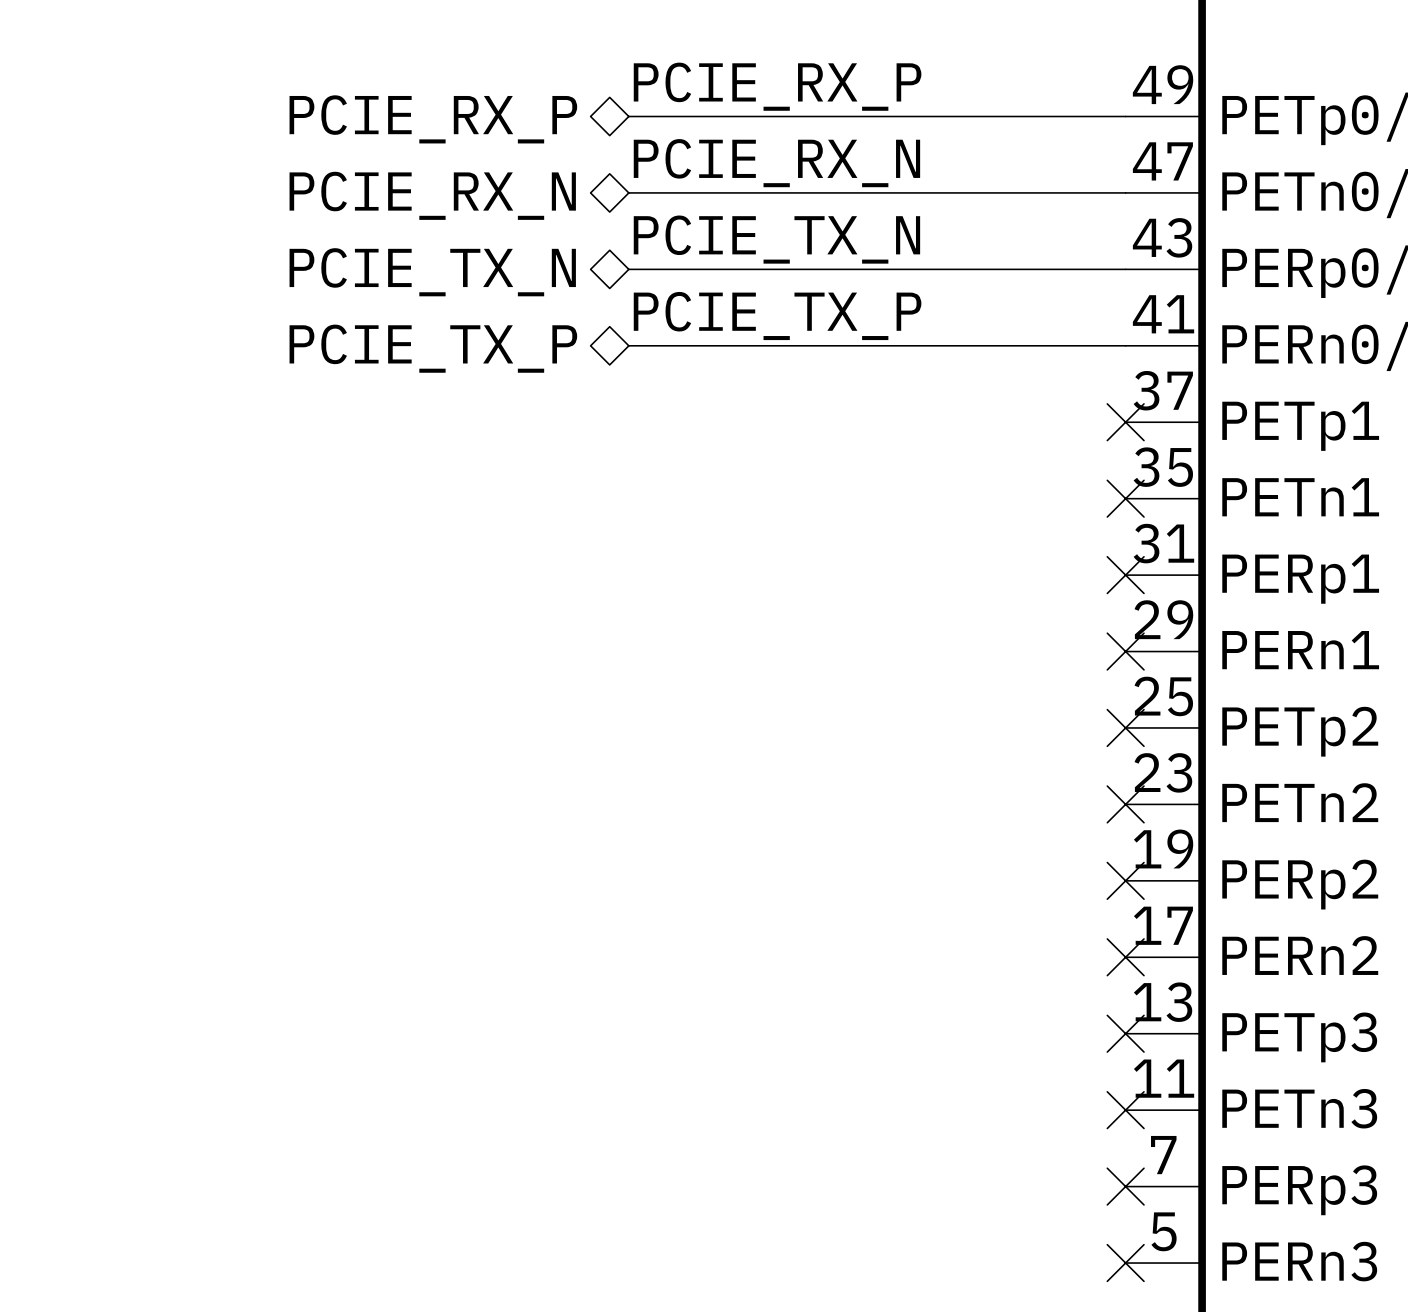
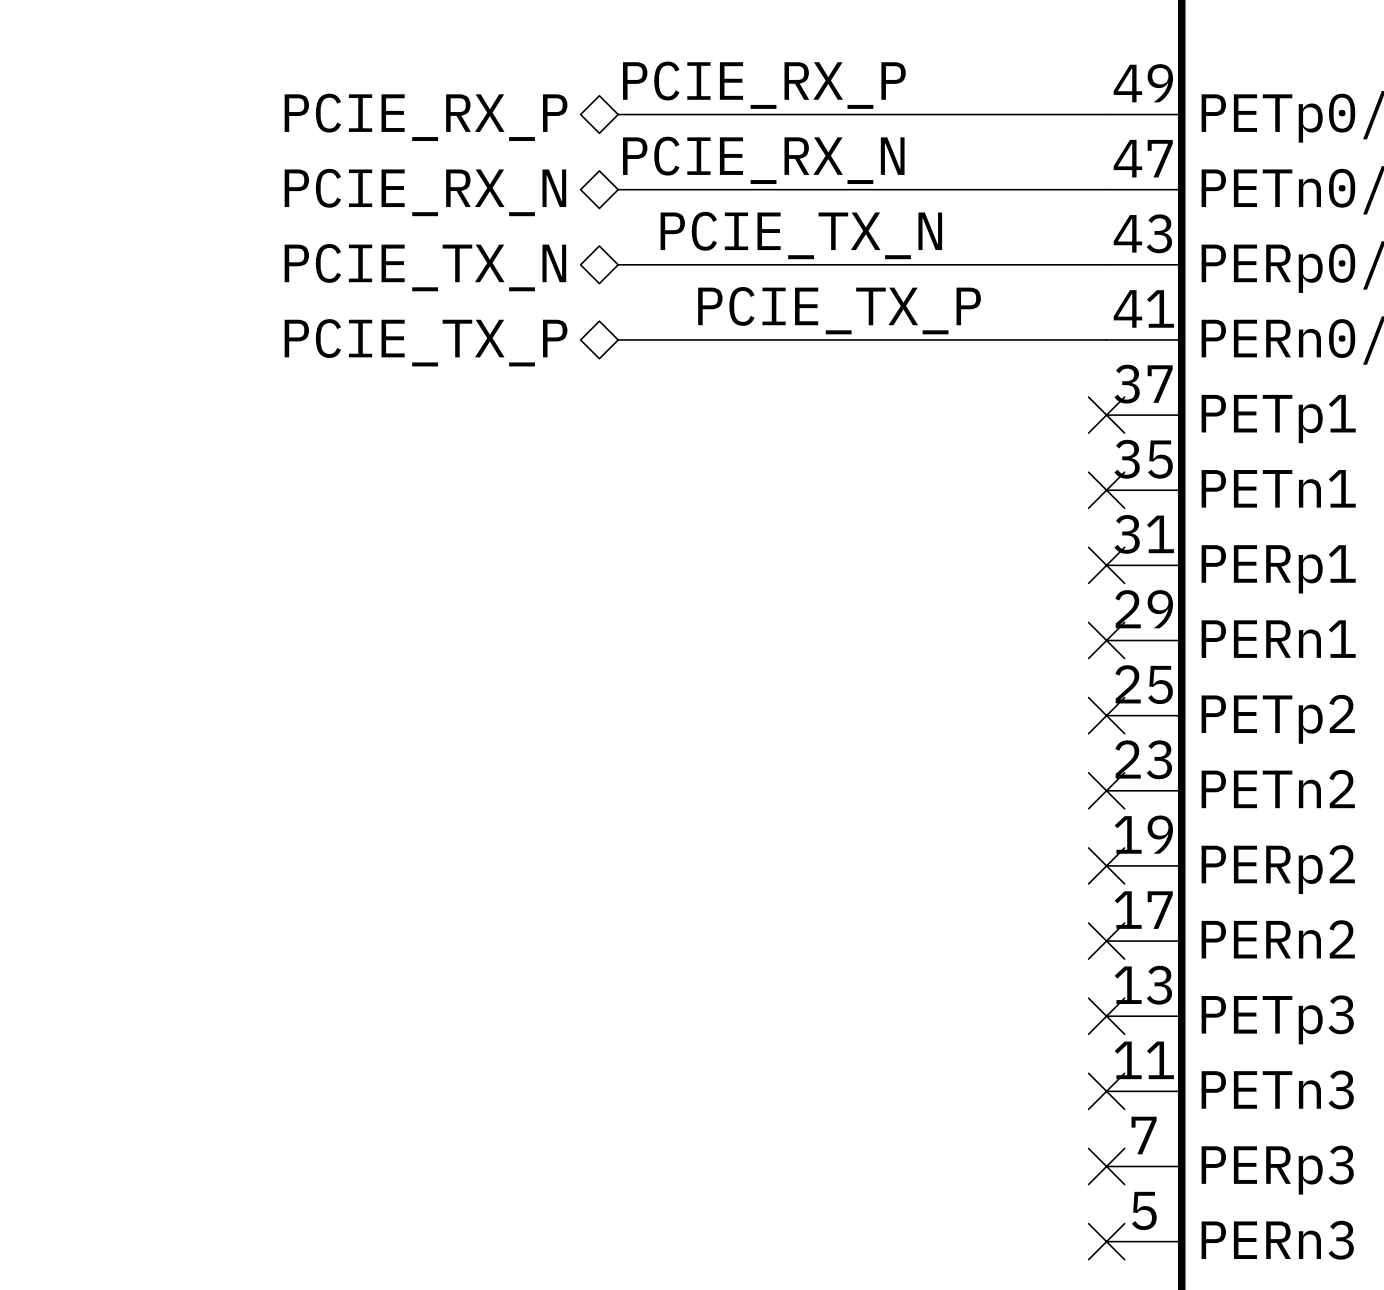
label position: PCIE_TX_N (776, 239) -> PCIE_TX_N (801, 235)
label position: PCIE_TX_P (777, 316) -> PCIE_TX_P (839, 310)

